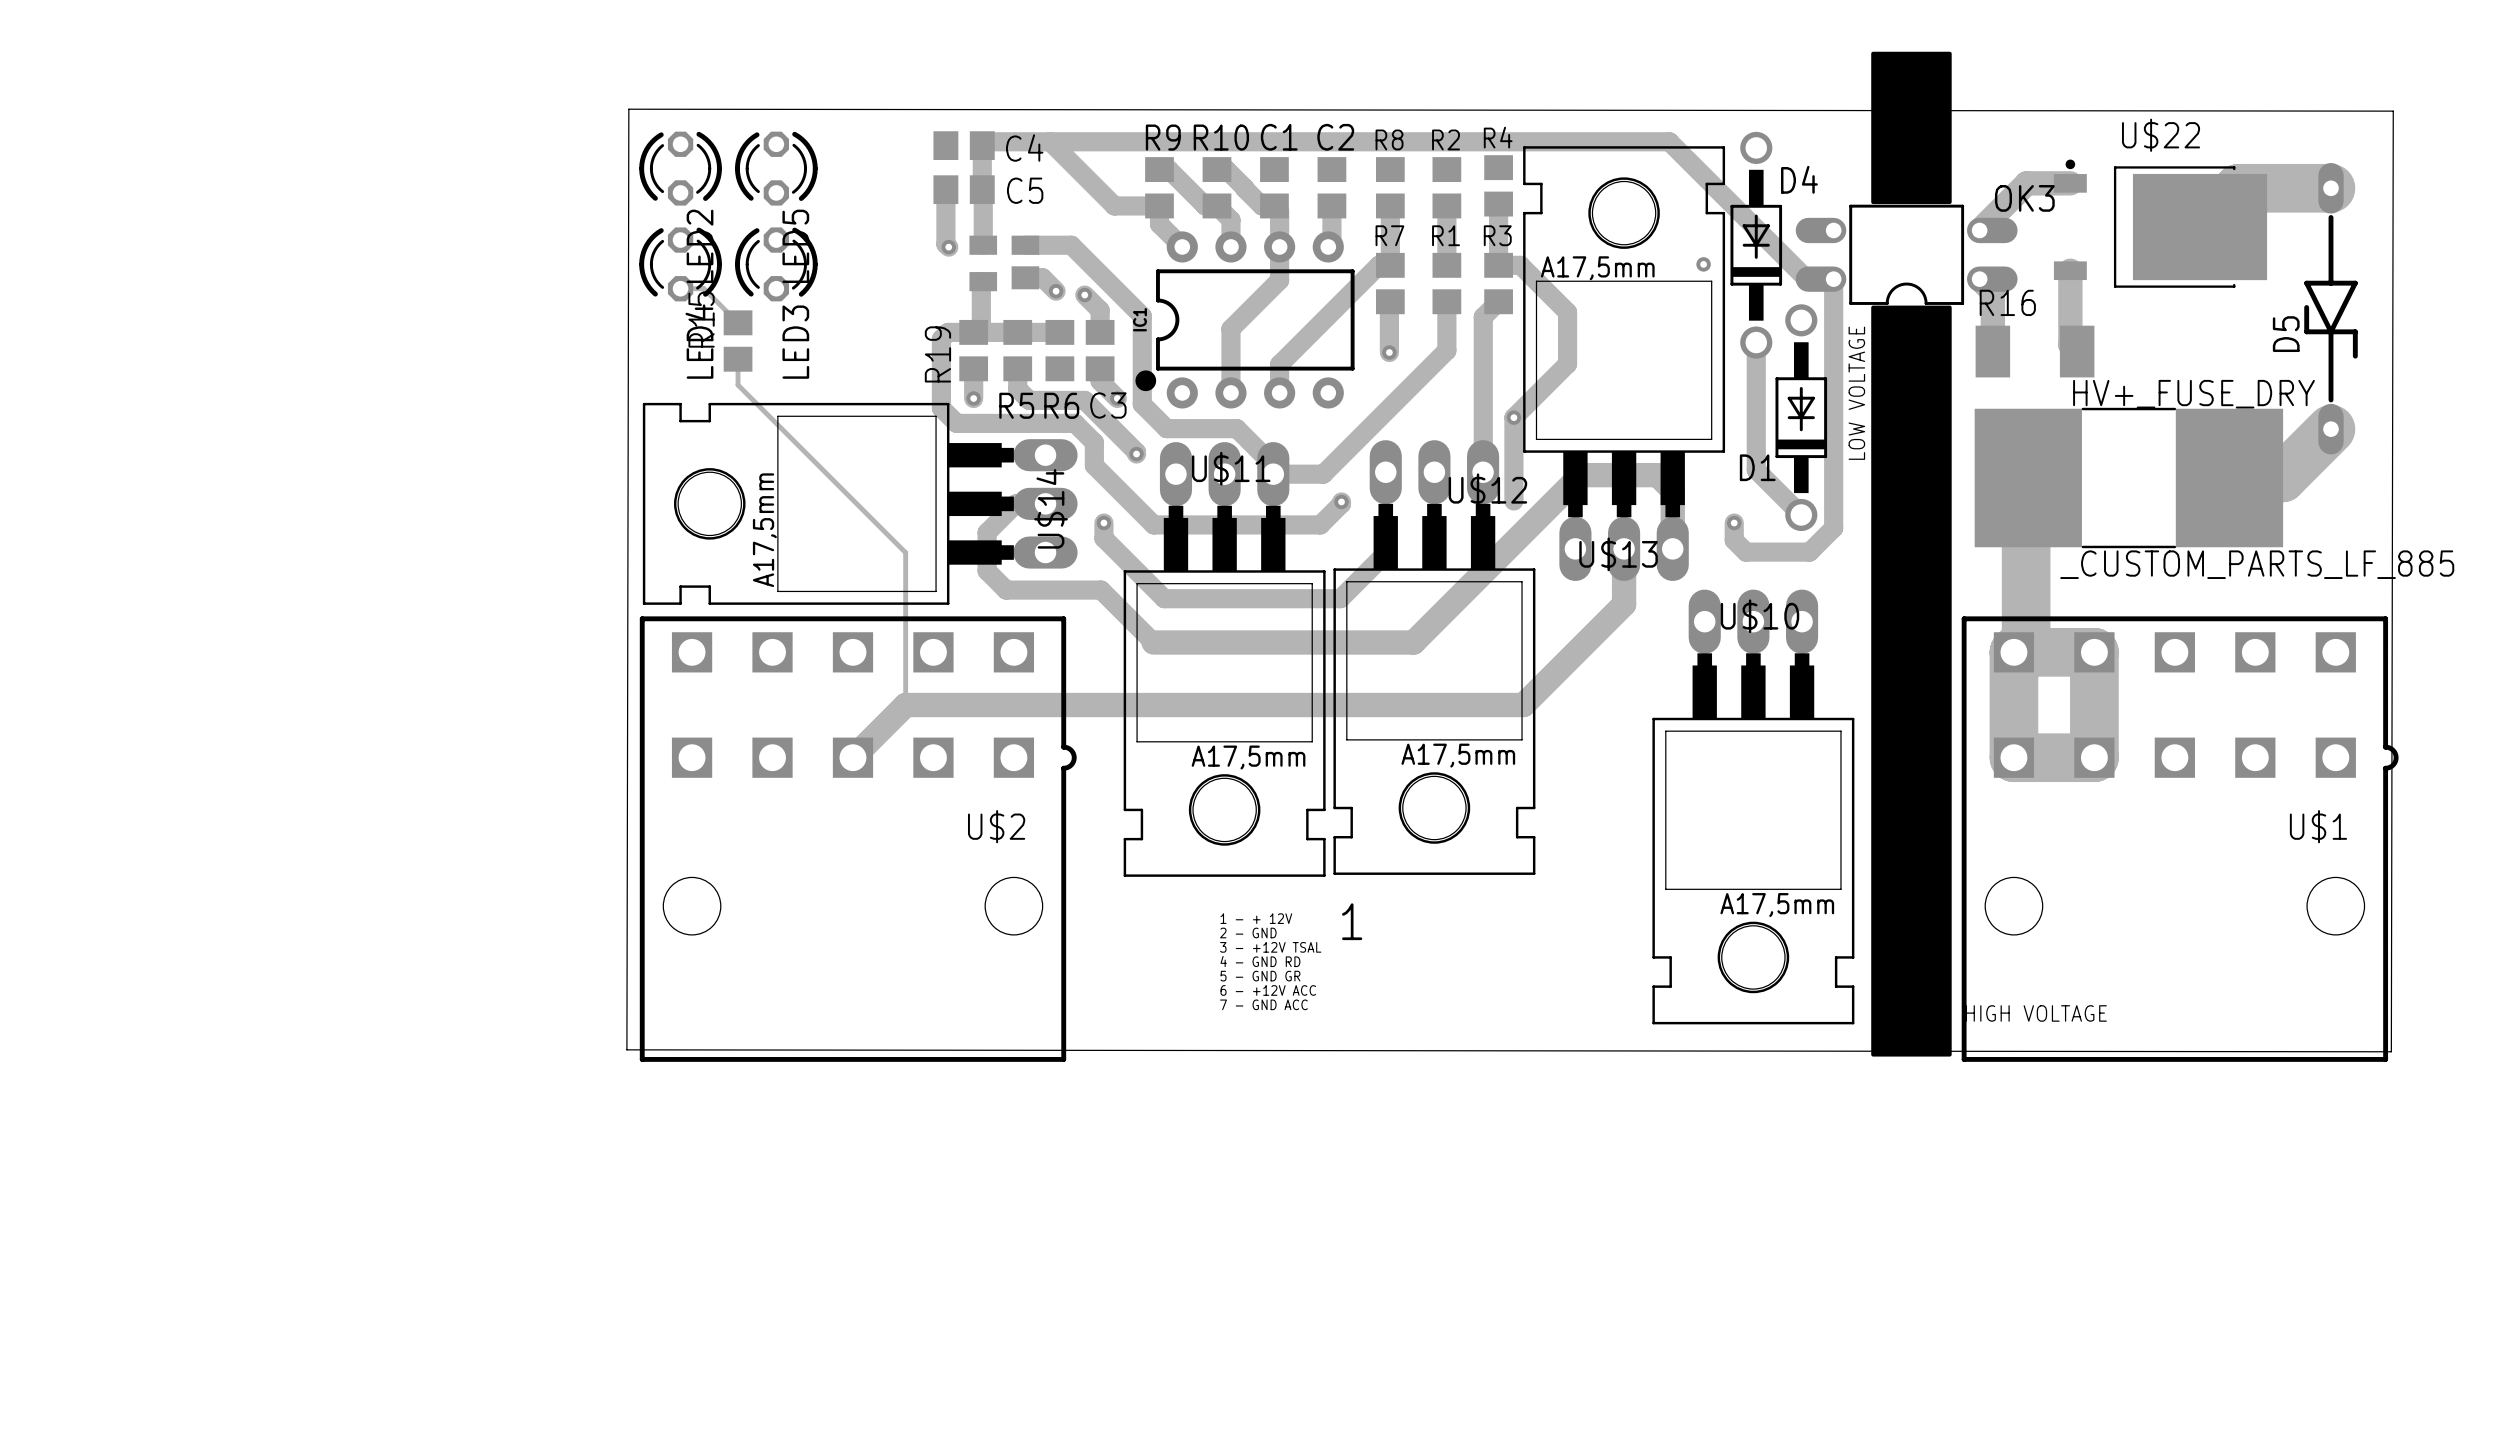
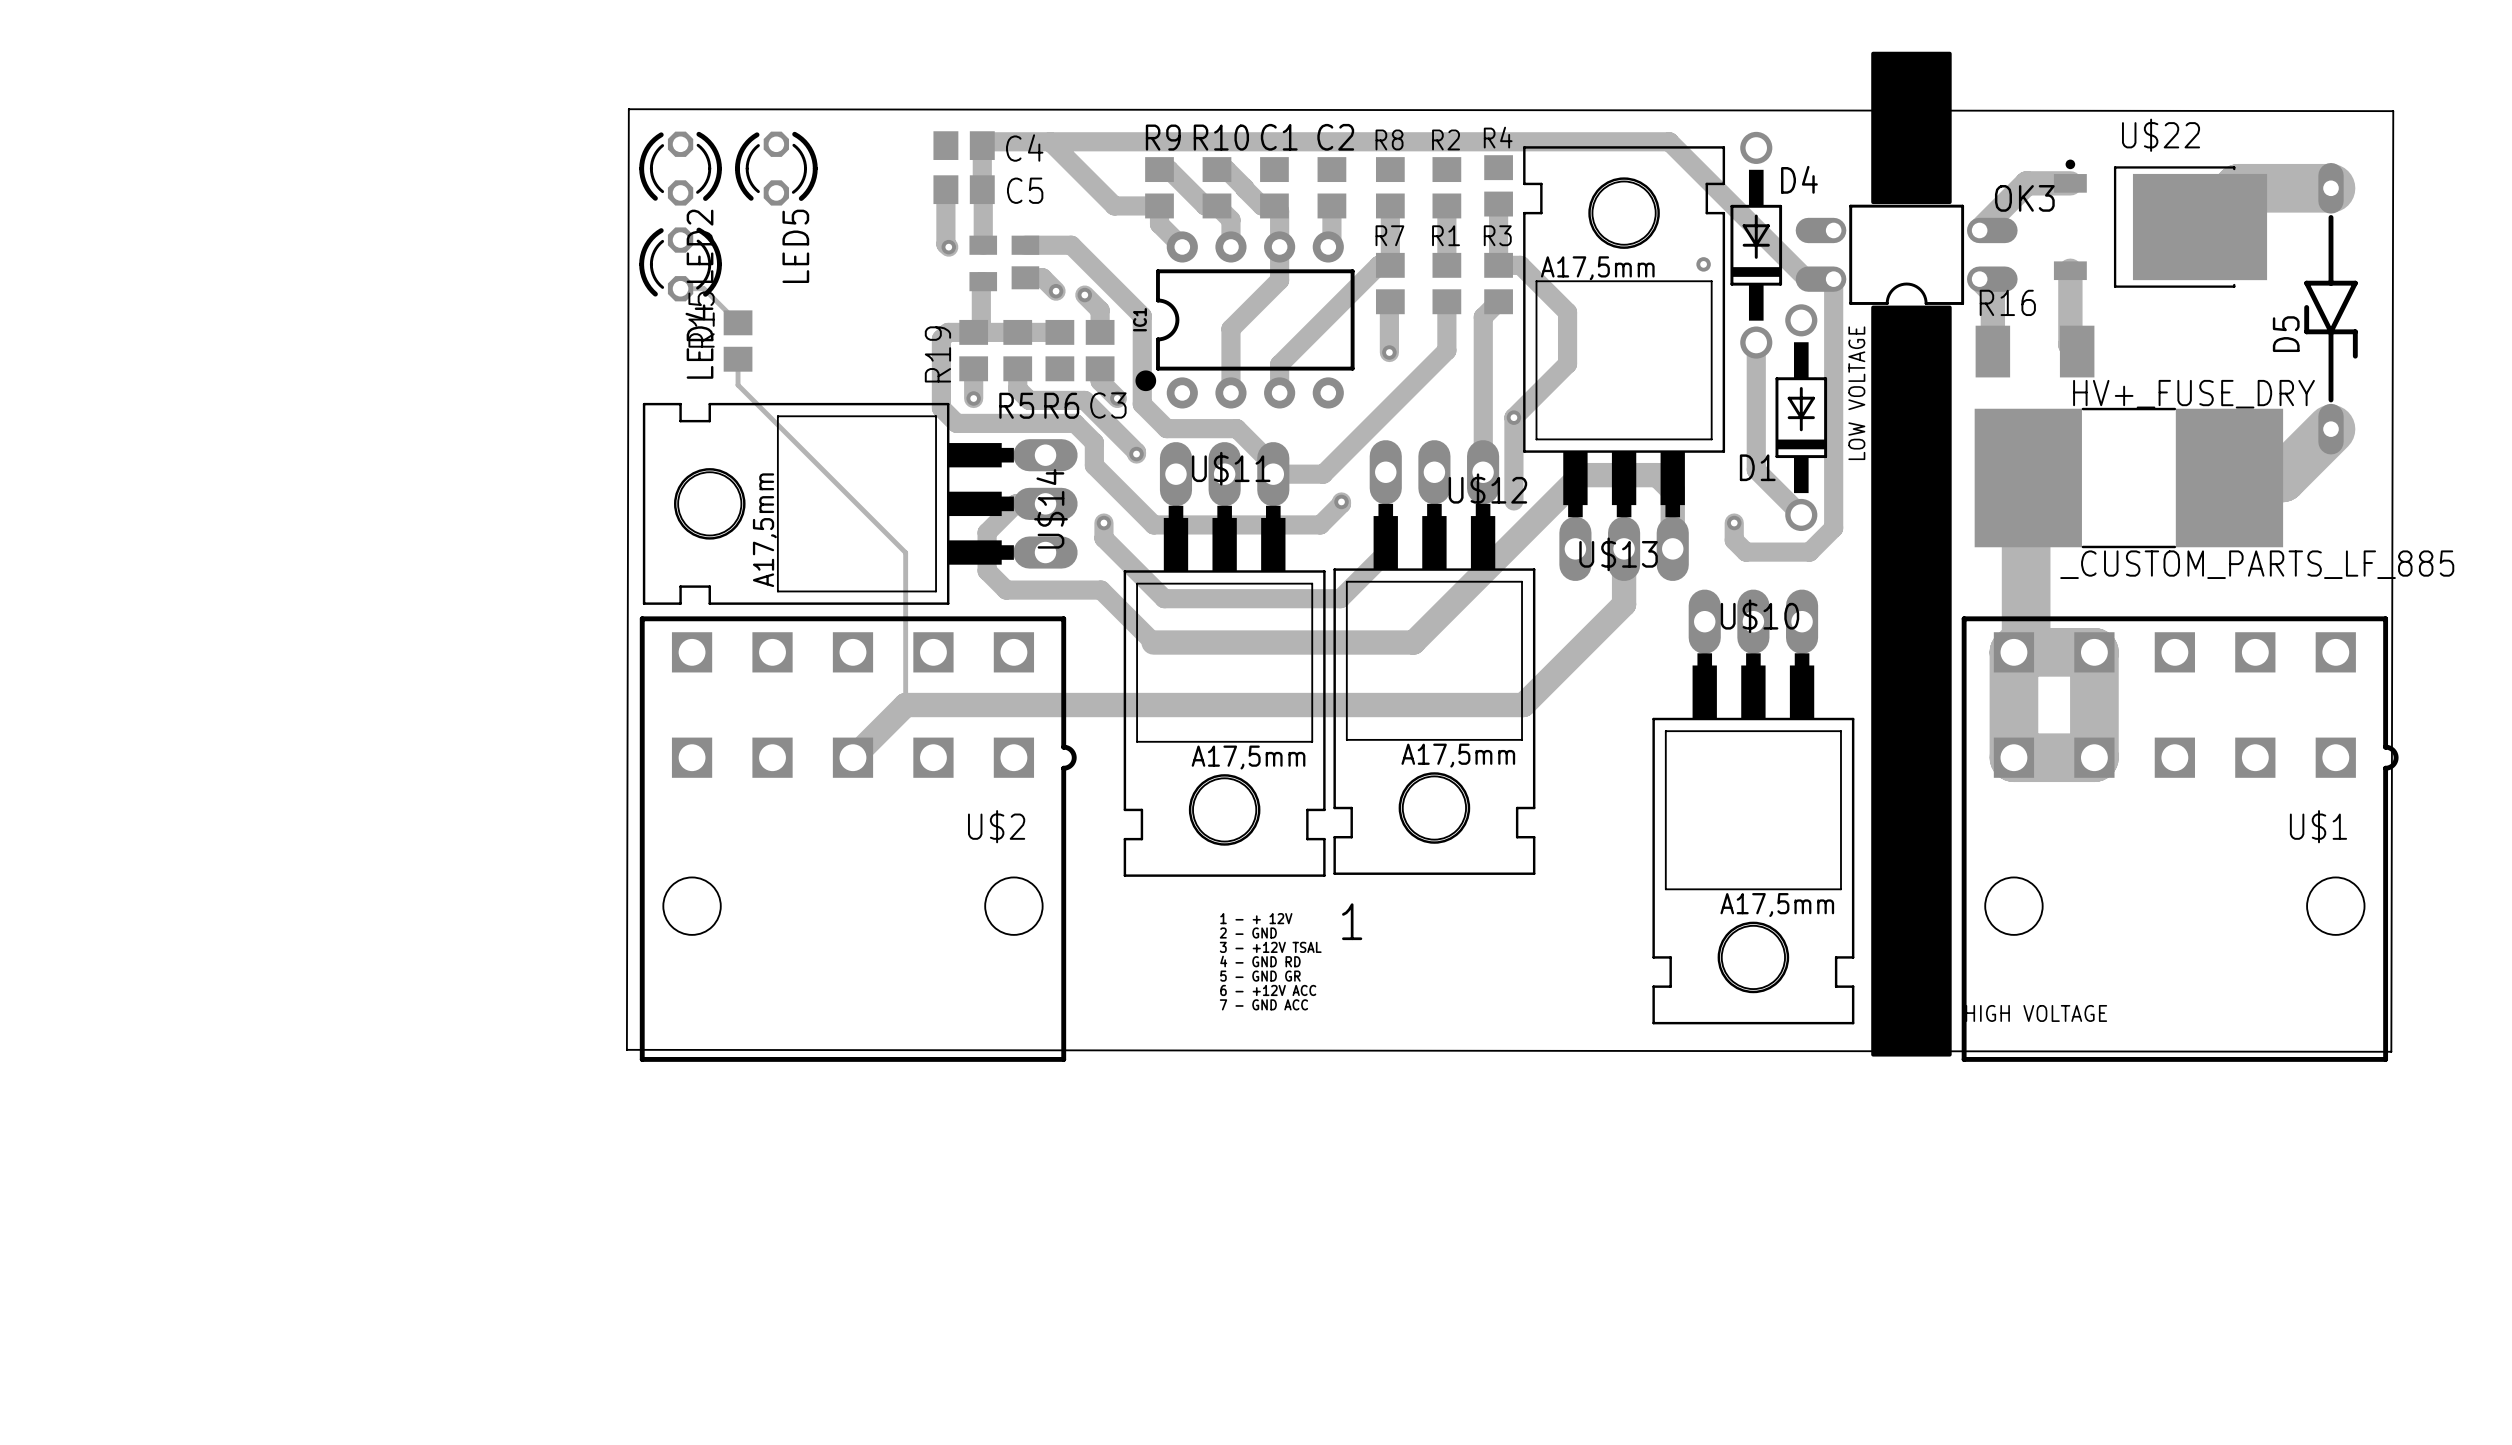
LED3: (776, 264) -> none

